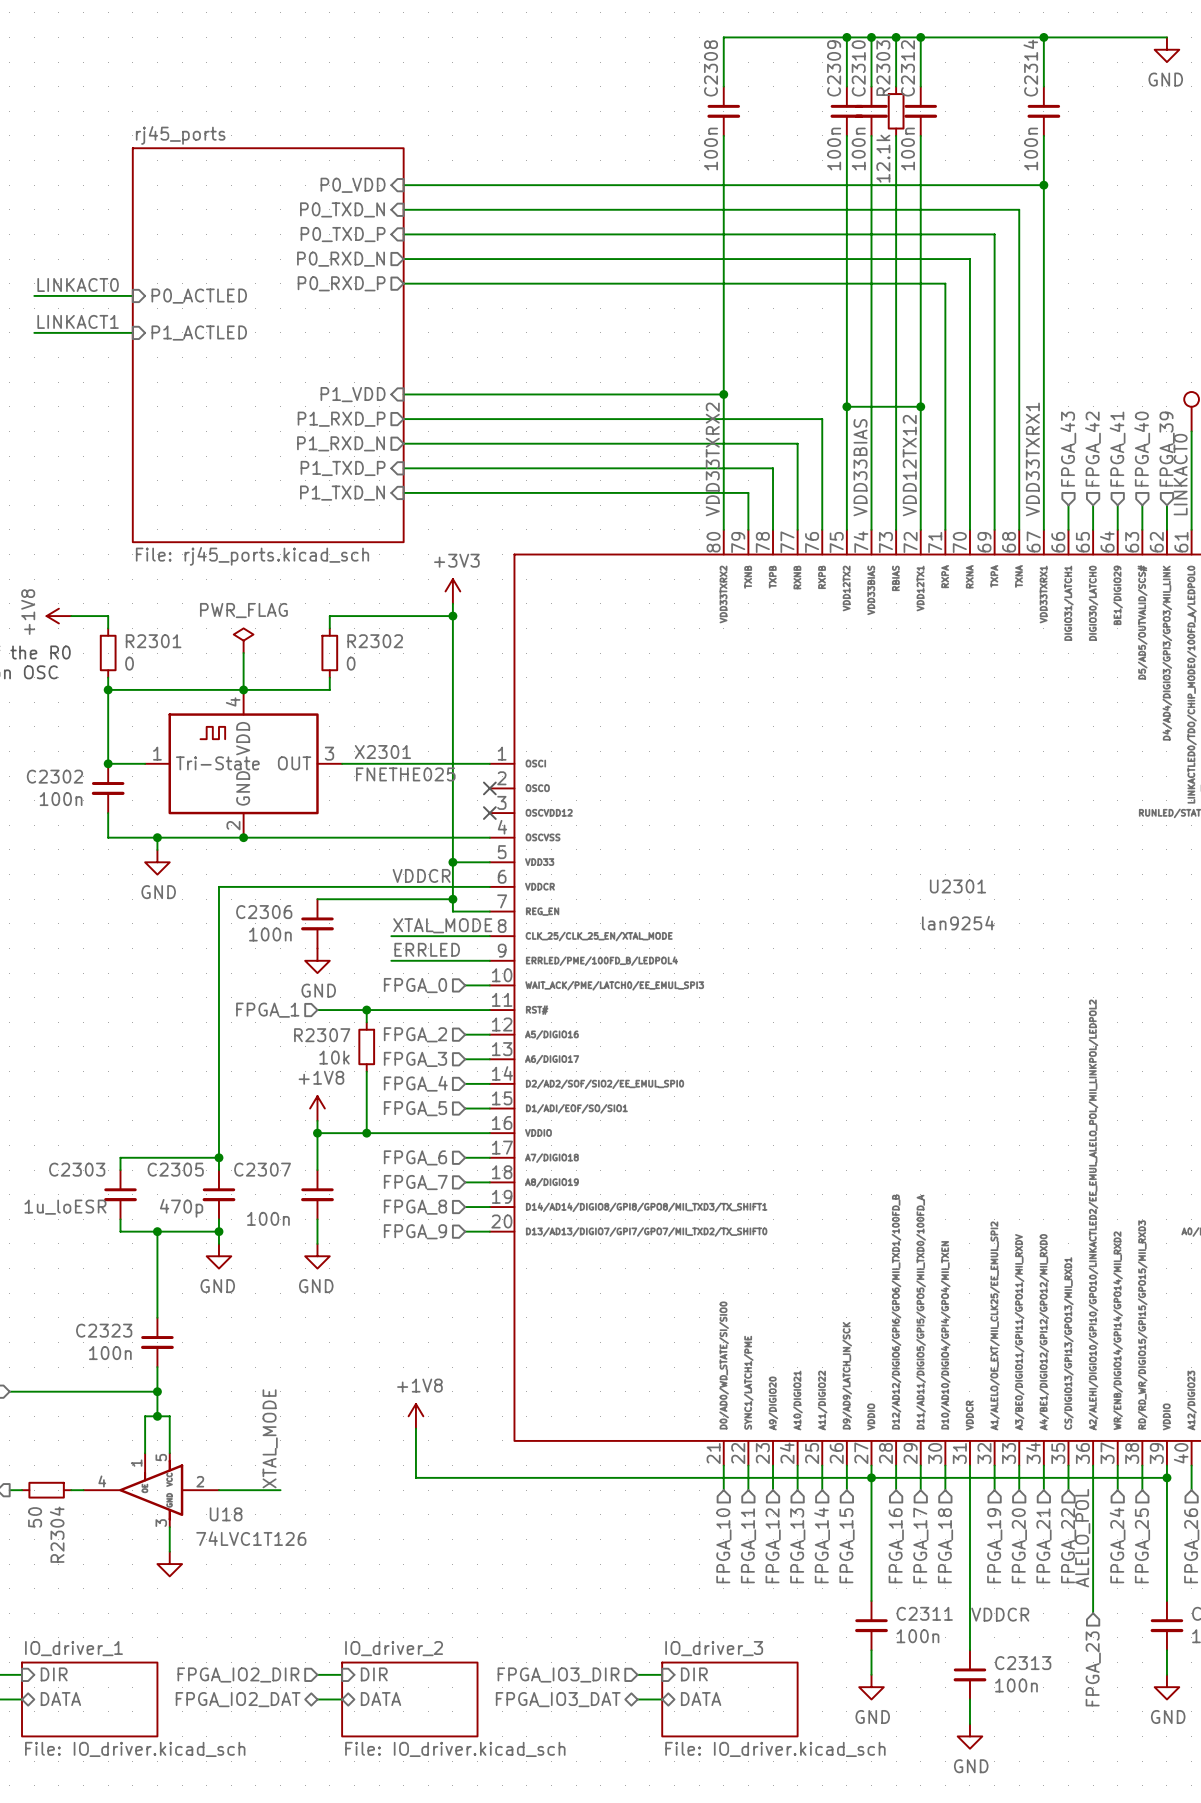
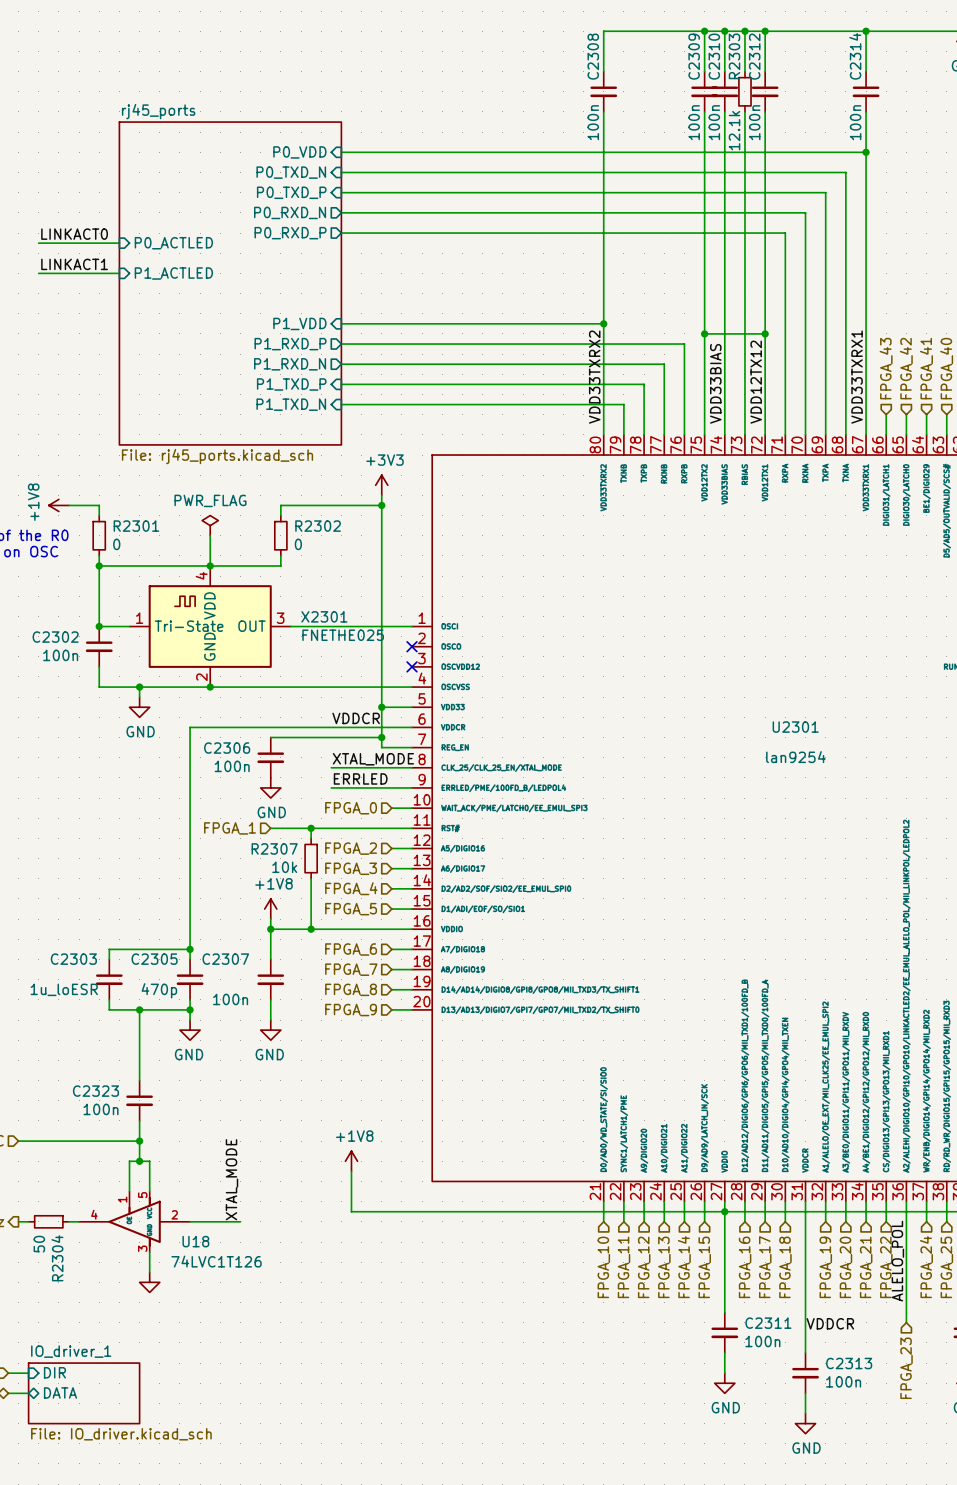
hierarchical label: FPGA_IO2_DIR (238, 1674) -> none
wire: (317, 1674) (342, 1674) -> none
sheet pin: DIR (374, 1674) -> none
hierarchical label: FPGA_IO3_DIR (558, 1674) -> none
wire: (637, 1674) (662, 1674) -> none
sheet pin: DIR (694, 1674) -> none
hierarchical label: FPGA_IO2_DAT (238, 1699) -> none
wire: (317, 1699) (342, 1699) -> none
sheet pin: DATA (380, 1699) -> none
sheet IO_driver_2: File: IO_driver.kicad_sch (409, 1699) -> none
hierarchical label: FPGA_IO3_DAT (558, 1699) -> none
wire: (637, 1699) (662, 1699) -> none
sheet pin: DATA (701, 1699) -> none
sheet IO_driver_3: File: IO_driver.kicad_sch (729, 1699) -> none

